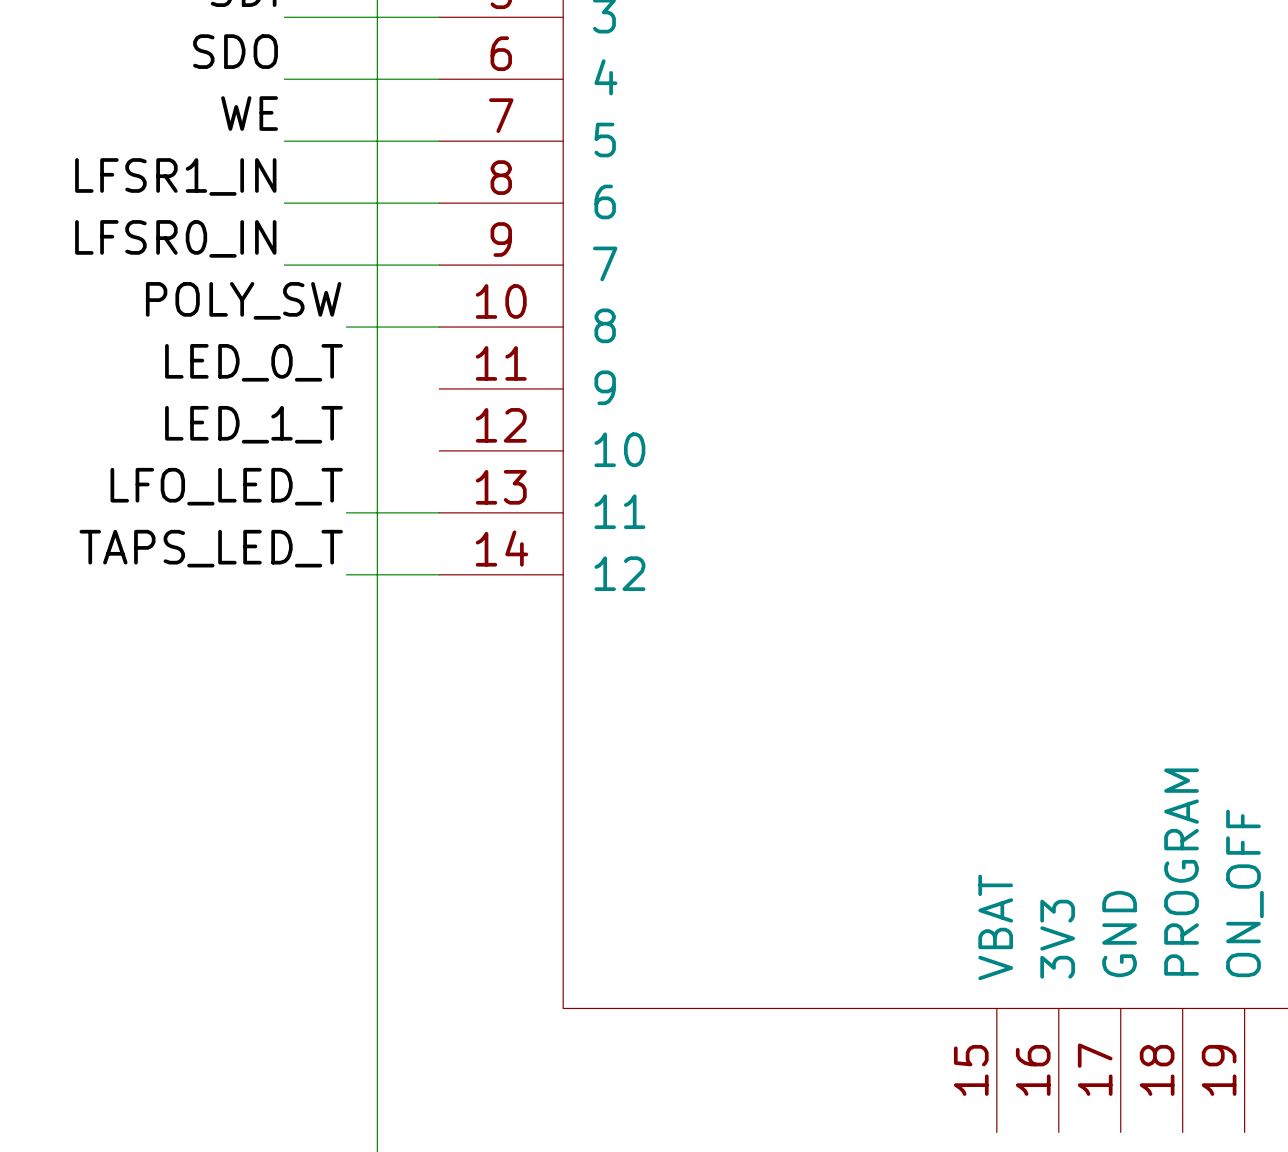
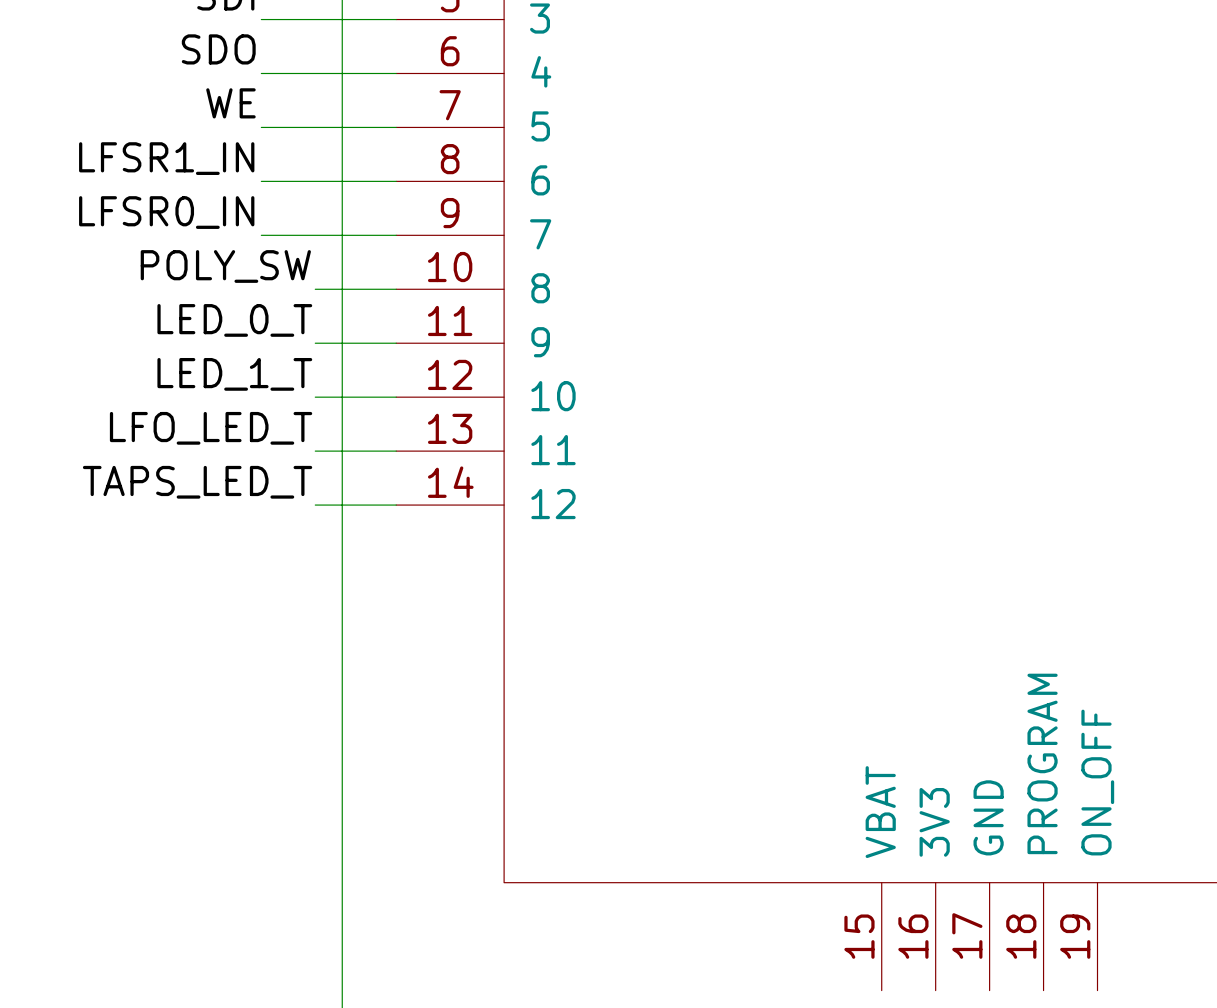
wire: none -> (315, 343) (396, 343)
wire: none -> (315, 397) (396, 397)

